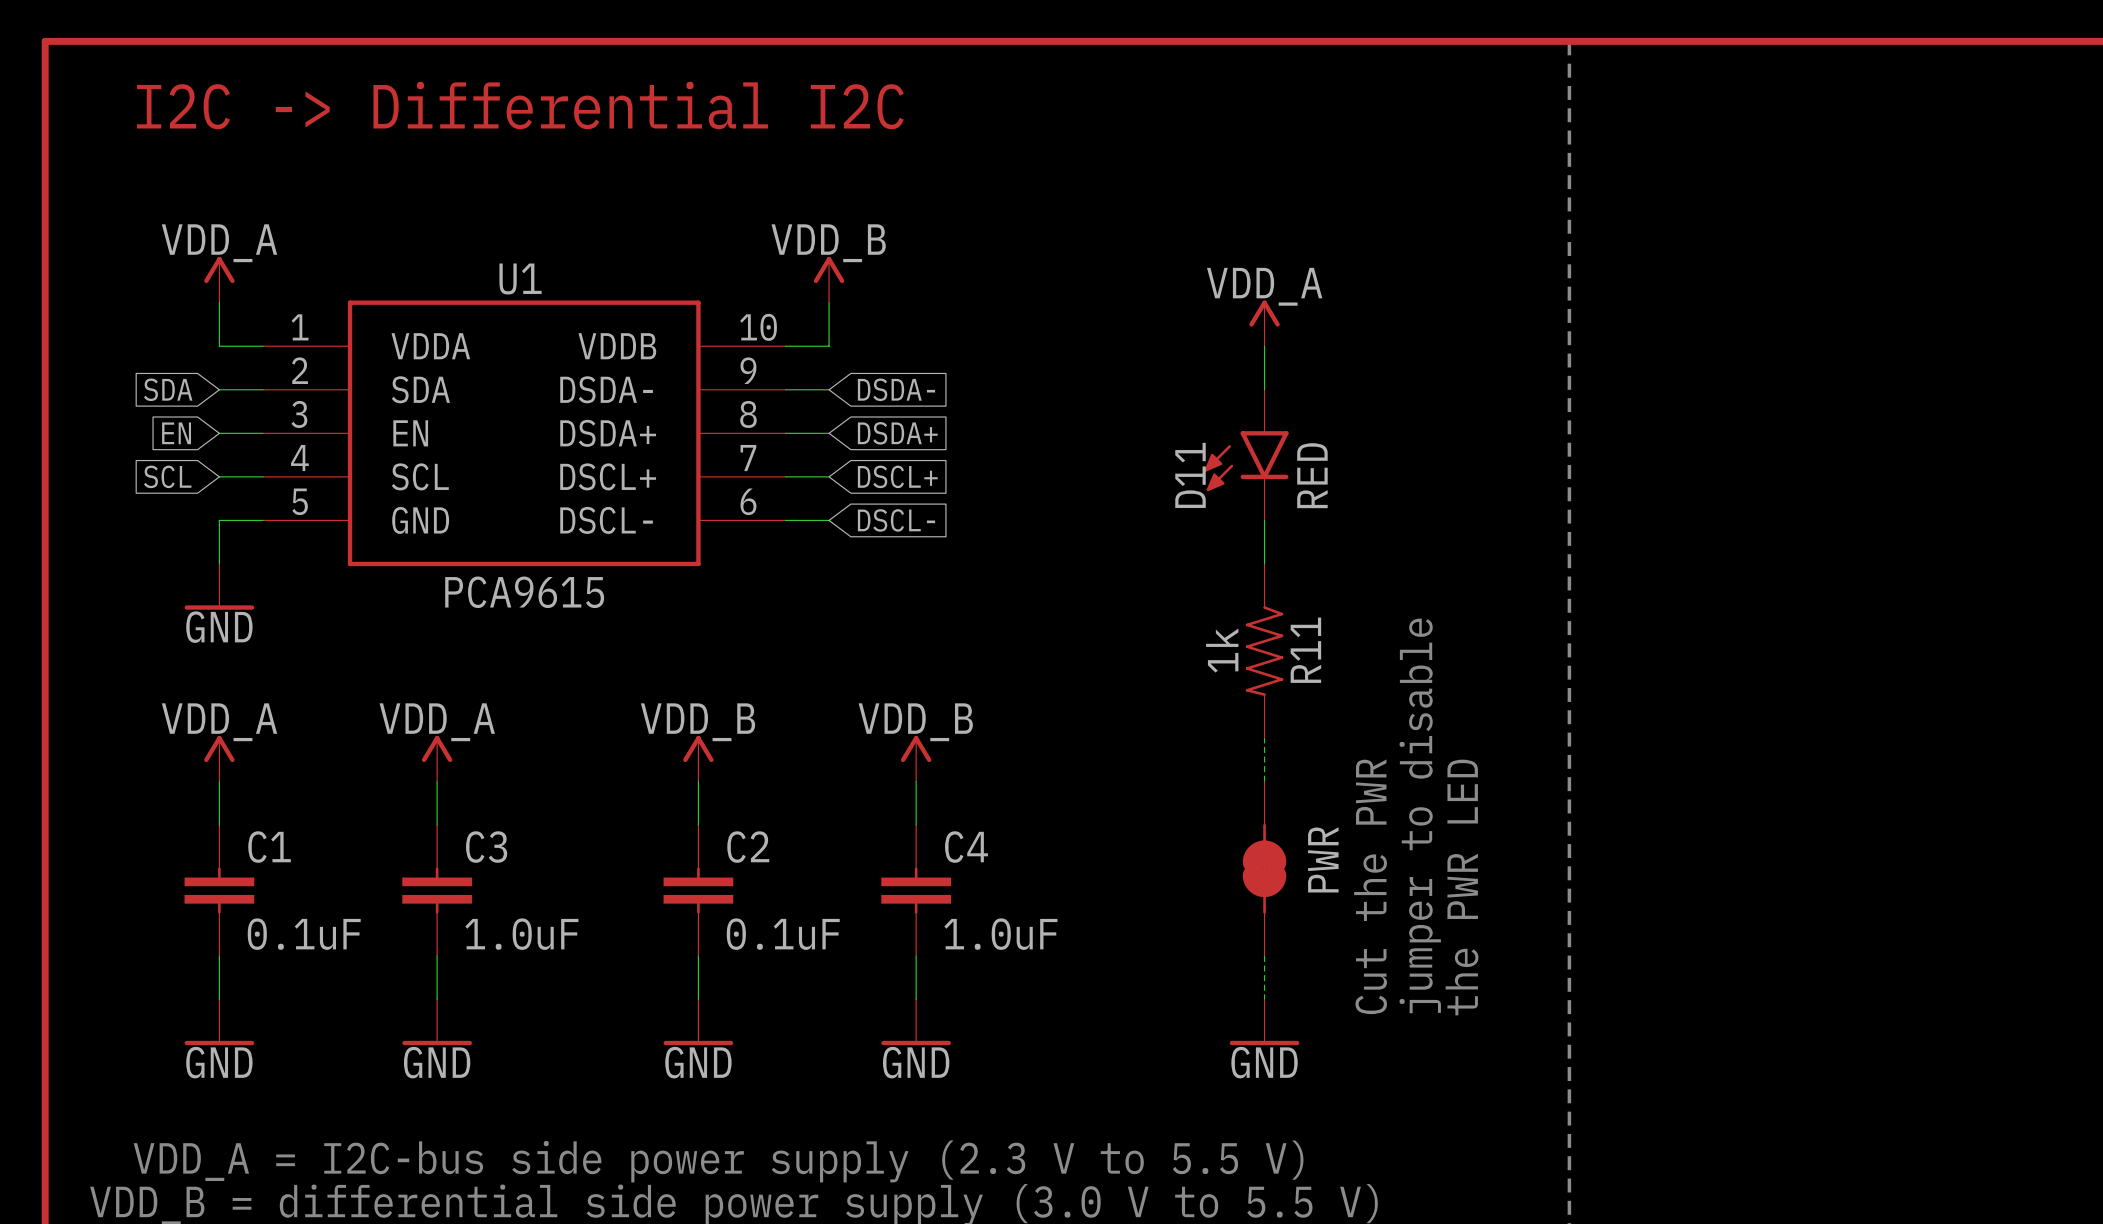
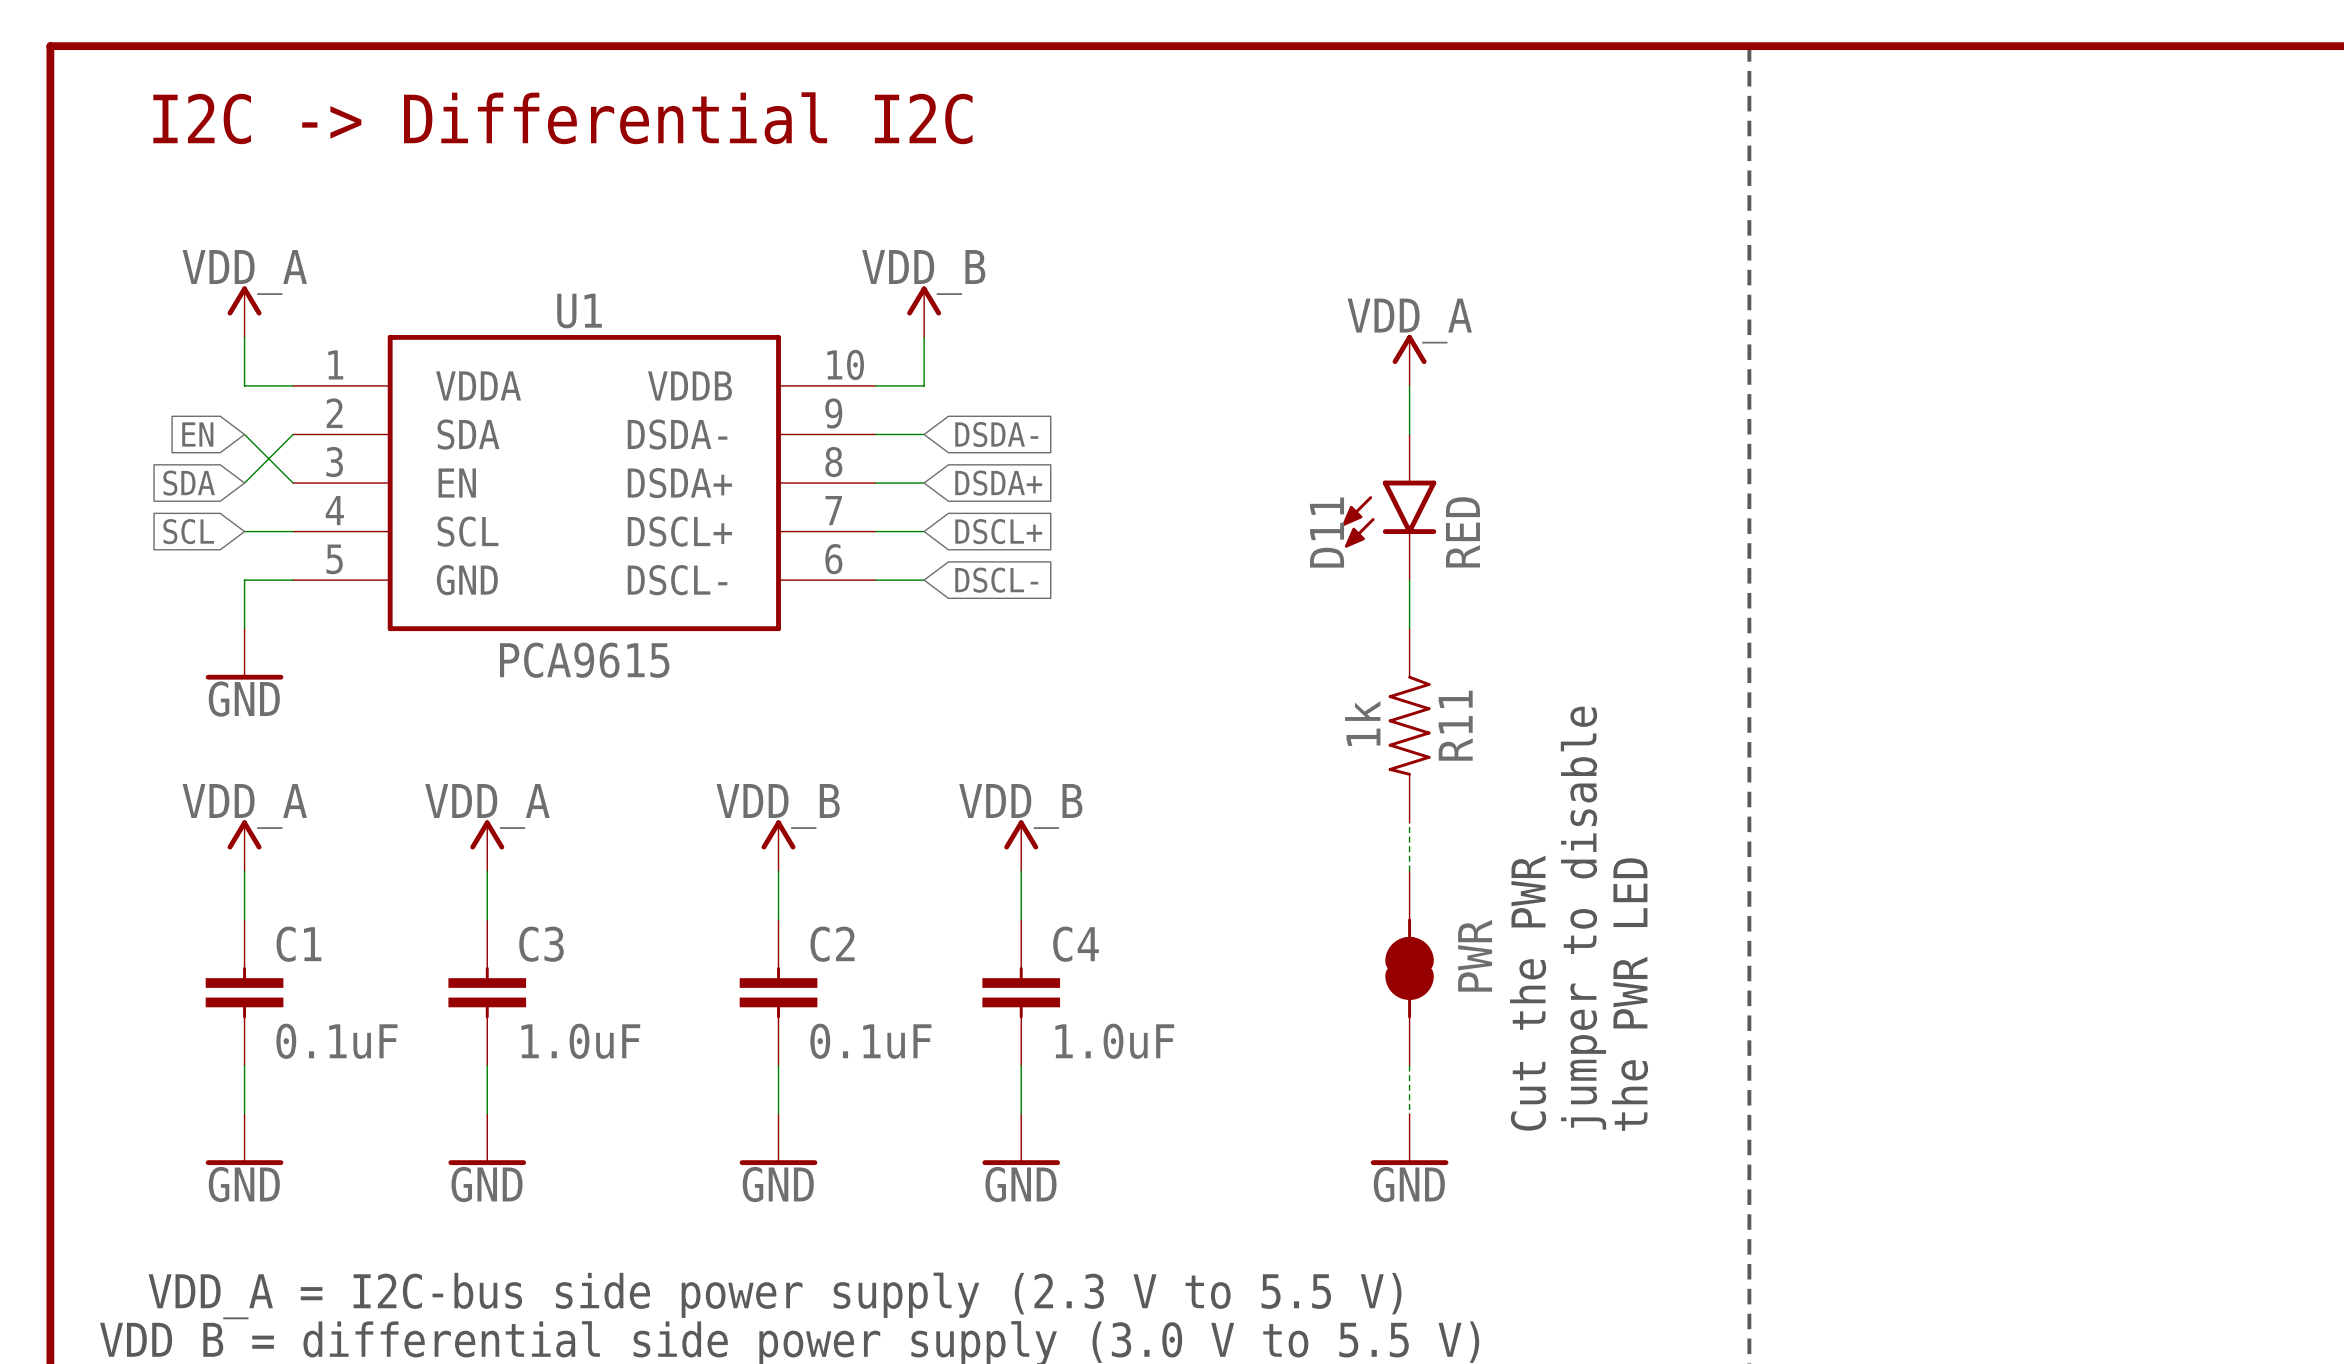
global label: SDA (168, 389) -> EN (197, 434)
wire: (219, 389) (262, 389) -> (244, 434) (293, 483)
global label: EN (176, 433) -> SDA (189, 483)
wire: (219, 433) (262, 433) -> (244, 483) (293, 434)

